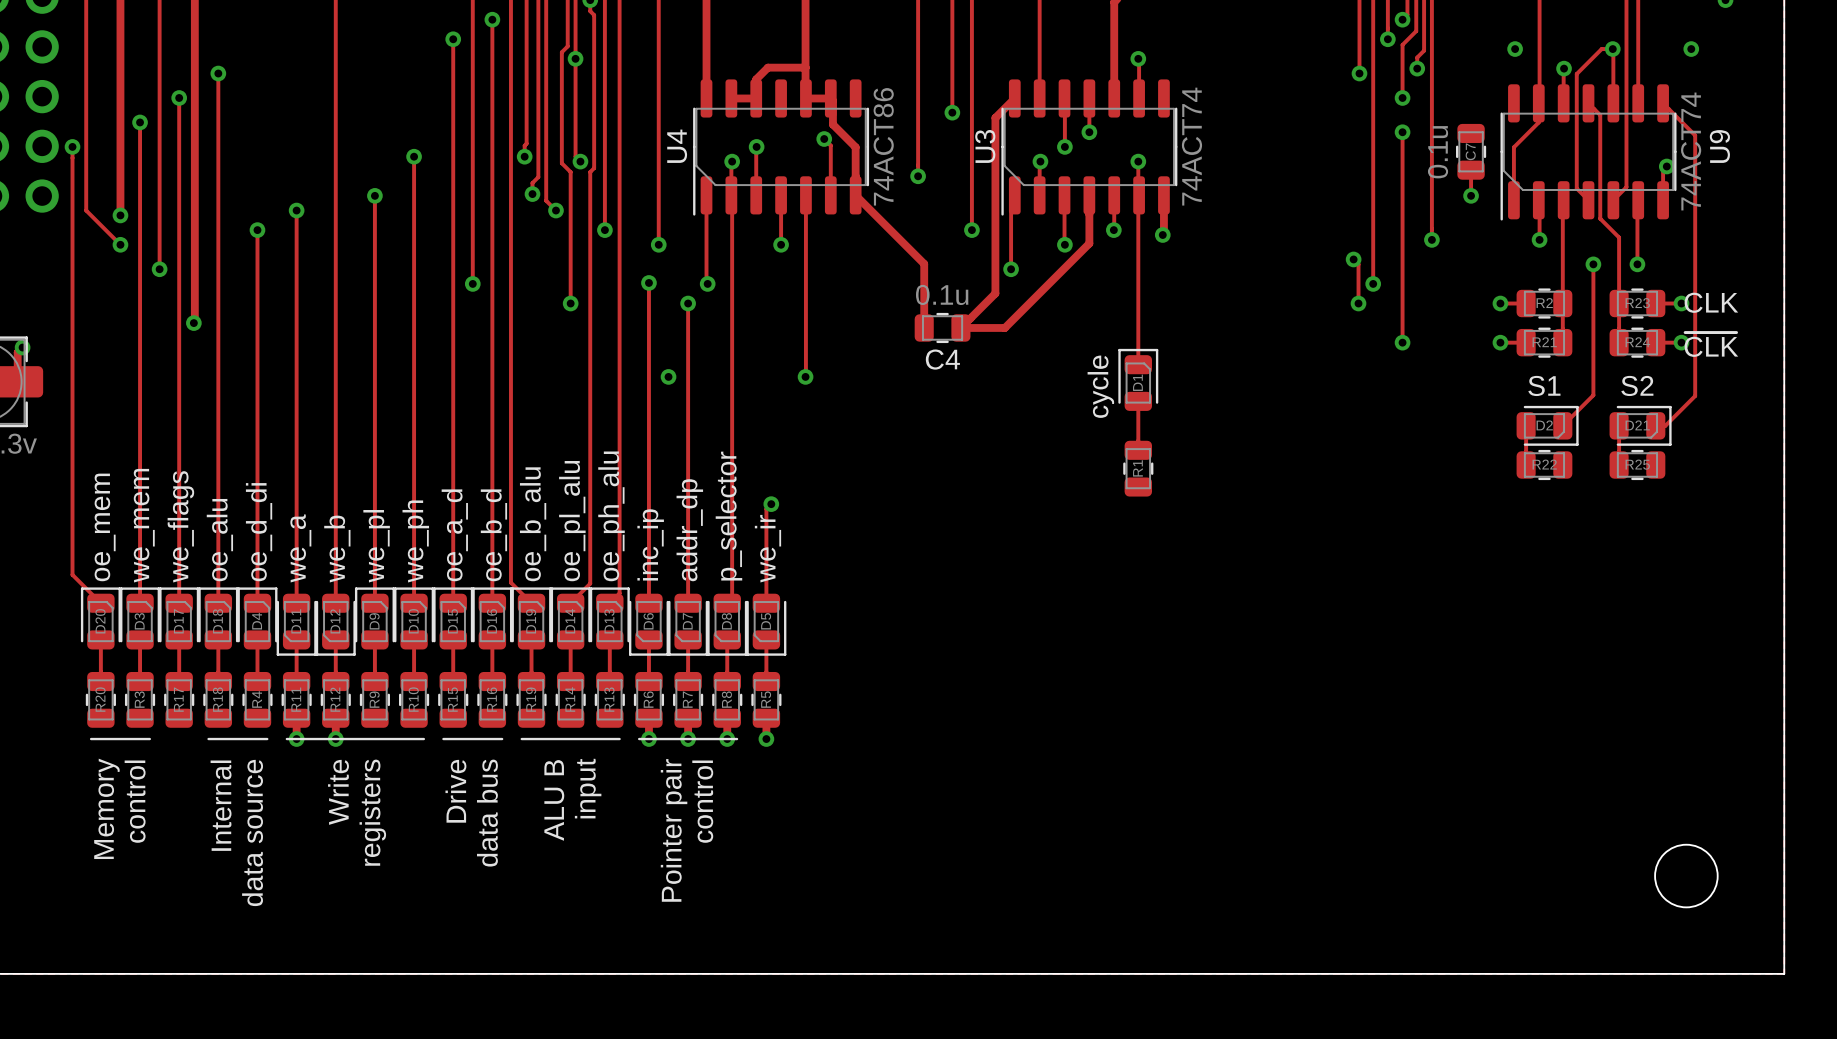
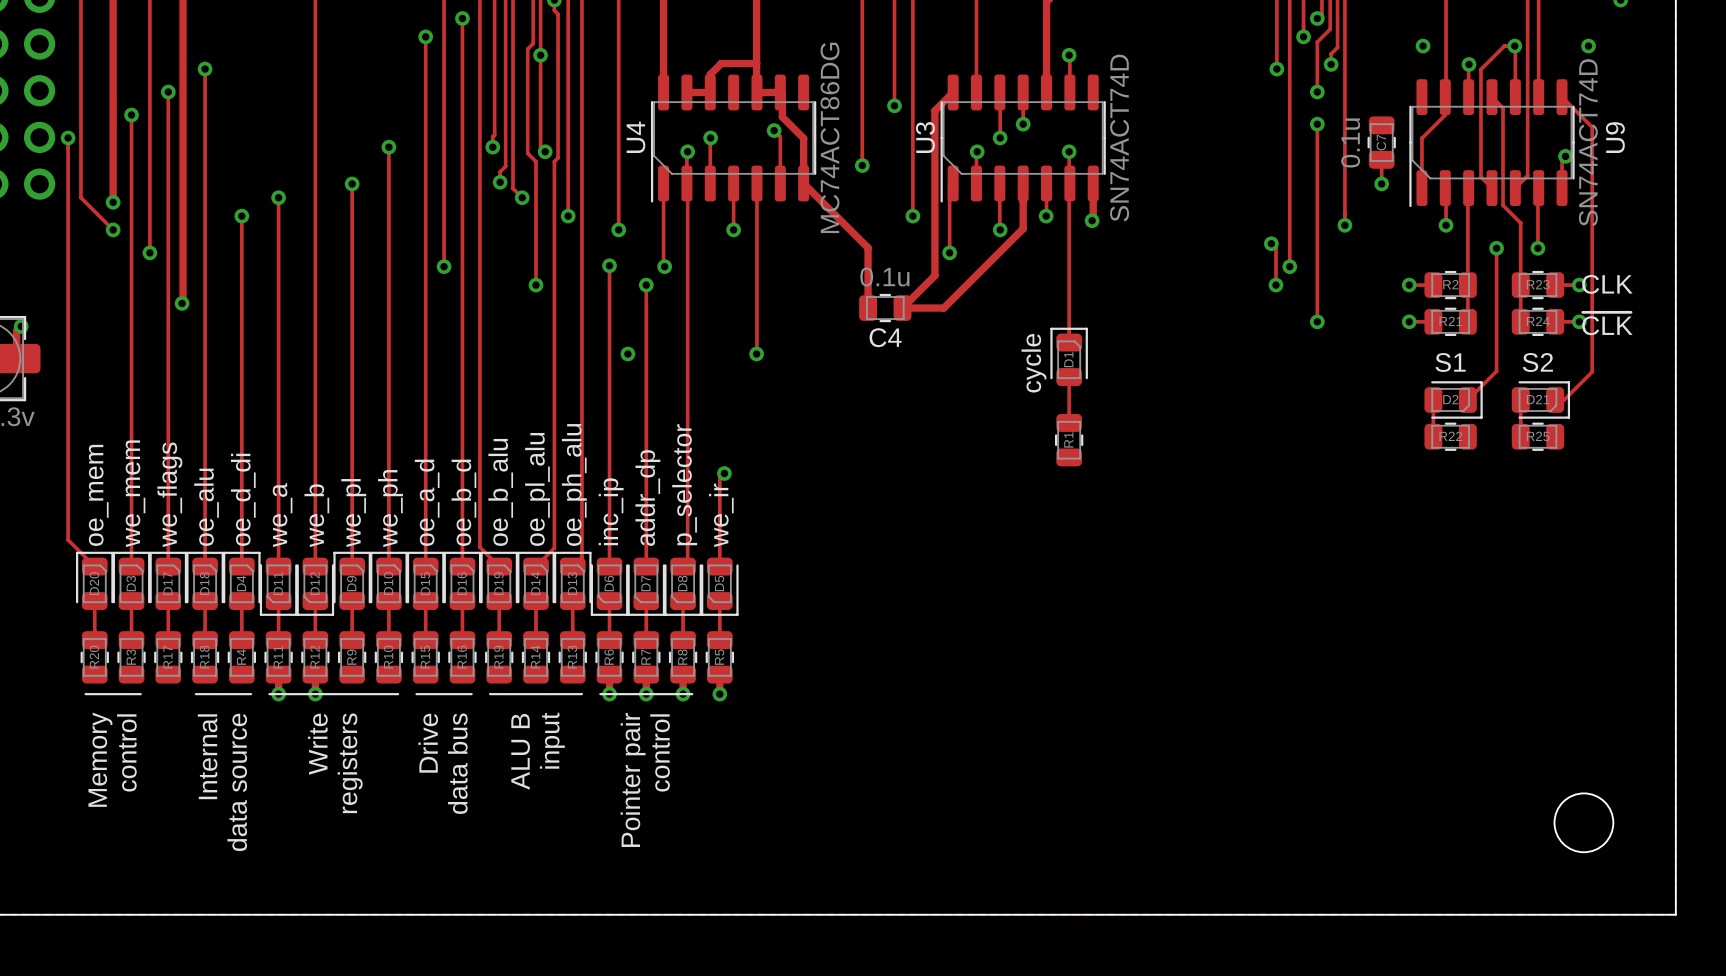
U4 value: 74ACT86 (883, 146) -> MC74ACT86DG (830, 137)
U3 value: 74ACT74 (1191, 146) -> SN74ACT74D (1119, 138)
U9 value: 74ACT74 (1691, 151) -> SN74ACT74D (1588, 142)

